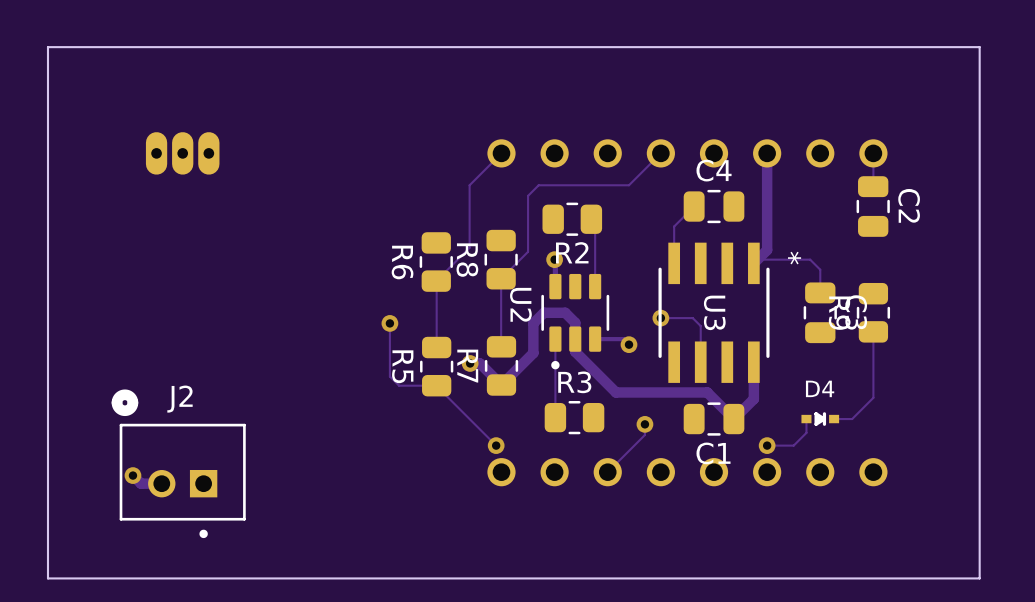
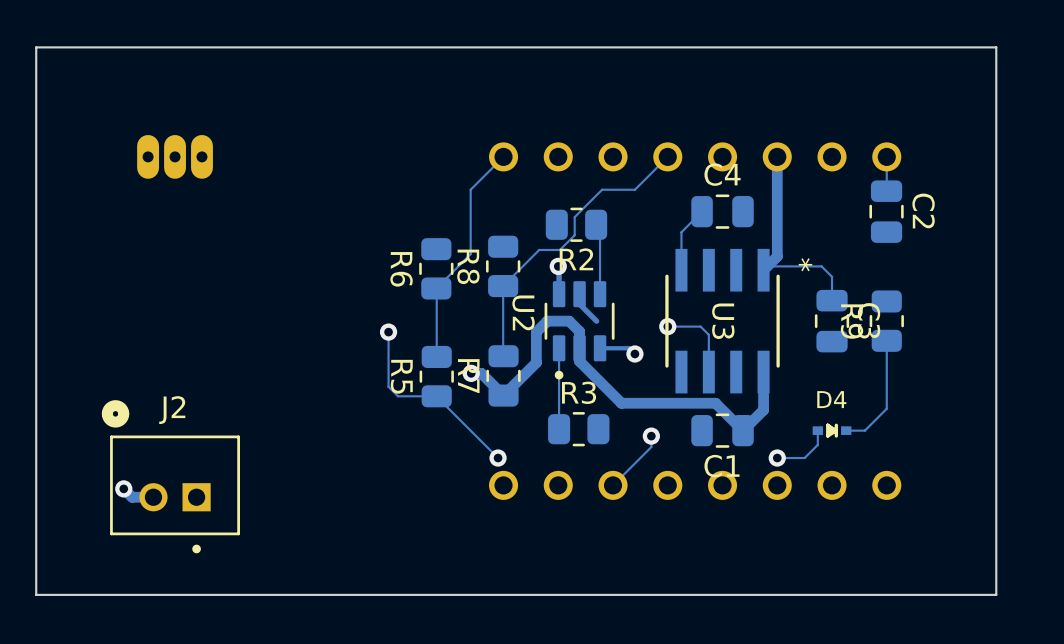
track: (597, 185) (538, 185) (528, 195) (528, 251) -> (602, 189) (574, 217) (574, 235) (559, 249) (539, 249) (530, 258)
track: none -> (579, 294) (579, 304) (596, 321)

